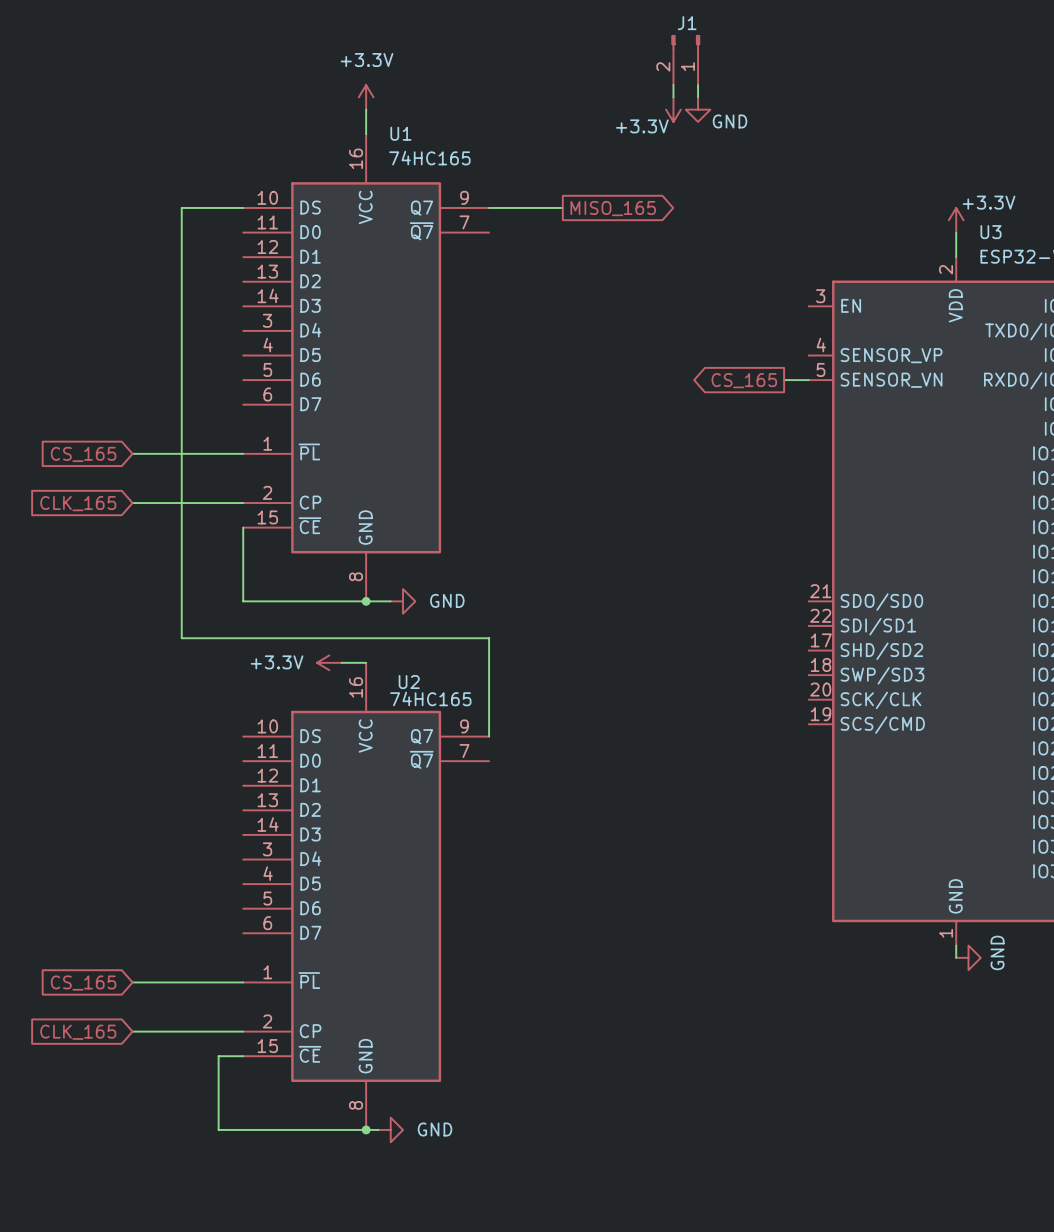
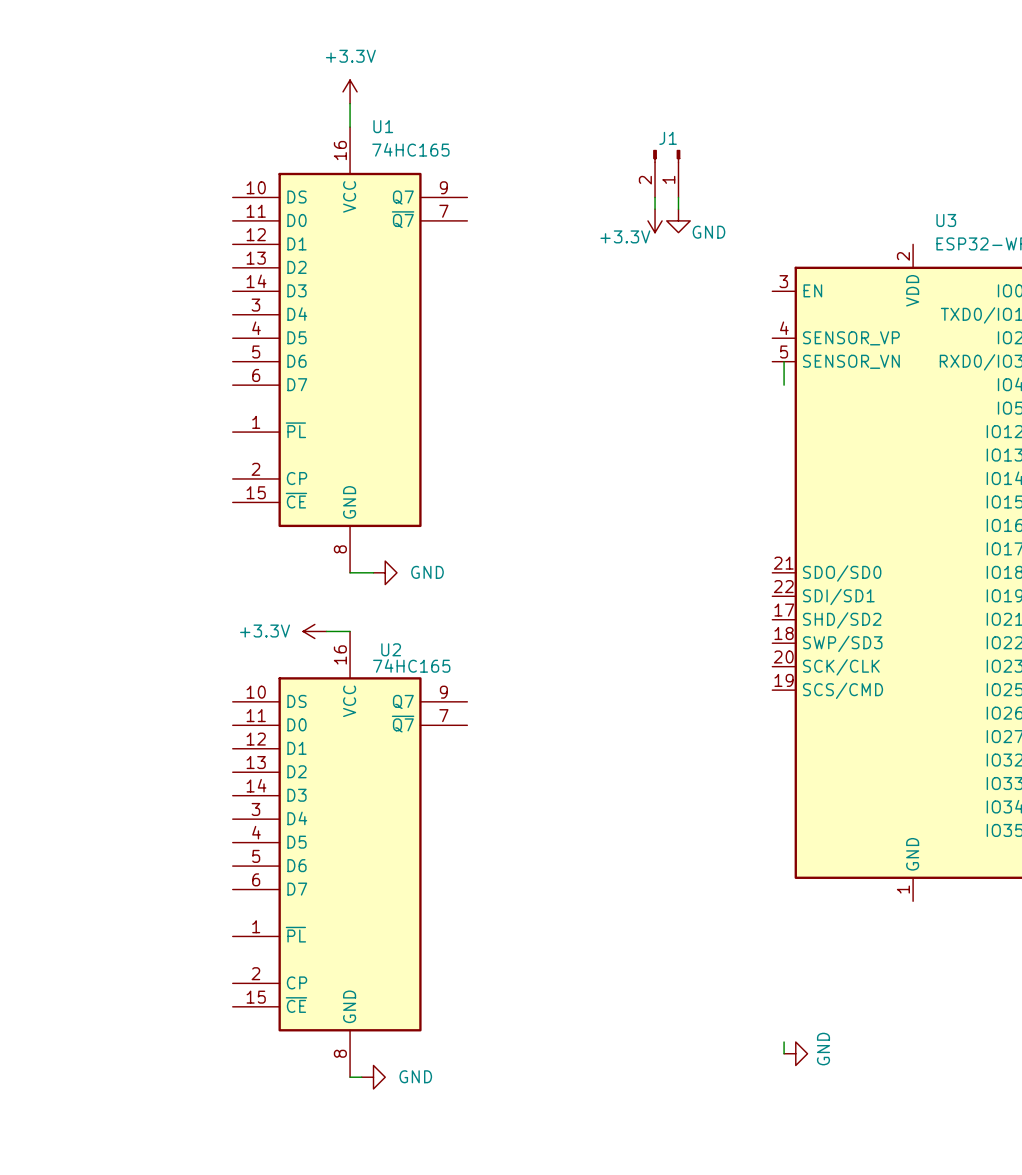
J1 position: (685, 60) -> (666, 173)
wire: (673, 85) (673, 97) -> (655, 197) (655, 209)
wire: (698, 85) (698, 97) -> (678, 197) (678, 209)
power symbol position: +3.3V (673, 109) -> +3.3V (655, 220)
power symbol position: GND (698, 109) -> GND (678, 220)
wire: (243, 207) (181, 207) (181, 638) (489, 638) (489, 736) -> none
wire: (489, 207) (562, 207) -> none
global label: MISO_165 (613, 208) -> none
power symbol: +3.3V (956, 220) -> none
wire: (956, 232) (956, 257) -> (784, 361) (784, 385)
global label: CS_165 (744, 380) -> none
wire: (784, 380) (808, 380) -> none
wire: (132, 453) (243, 453) -> none
global label: CS_165 (83, 454) -> none
global label: CLK_165 (78, 503) -> none
wire: (132, 503) (243, 503) -> none
wire: (243, 527) (243, 601) (366, 601) -> none
junction: (366, 601) -> none
wire: (956, 945) (956, 957) -> (784, 1042) (784, 1053)
power symbol position: GND (968, 957) -> GND (795, 1053)
wire: (132, 982) (243, 982) -> none
global label: CS_165 (83, 983) -> none
wire: (132, 1031) (243, 1031) -> none
global label: CLK_165 (78, 1032) -> none
wire: (243, 1056) (218, 1056) (218, 1129) (366, 1129) -> none
junction: (366, 1129) -> none

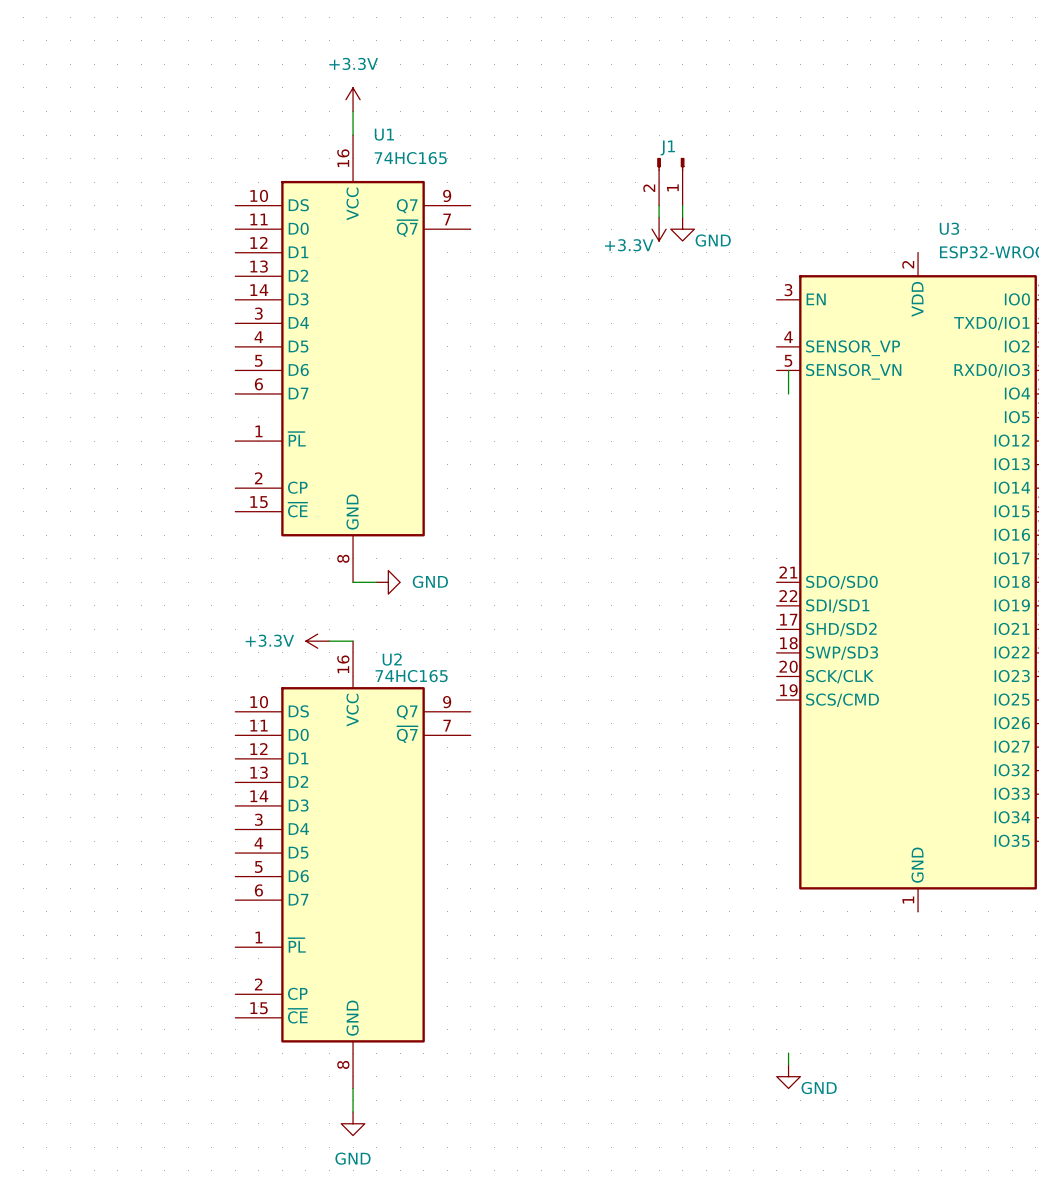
power symbol rotation: 0° (795, 1053) -> 90° clockwise (788, 1076)
power symbol position: GND (795, 1053) -> GND (788, 1076)
wire: (350, 1077) (361, 1077) -> (353, 1088) (353, 1112)
power symbol rotation: 0° (373, 1077) -> 90° clockwise (353, 1123)
power symbol position: GND (373, 1077) -> GND (353, 1123)

